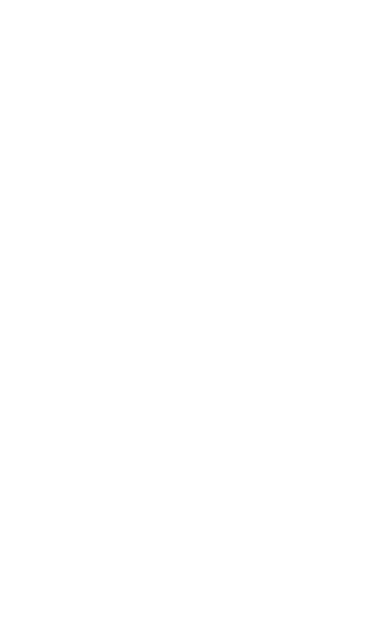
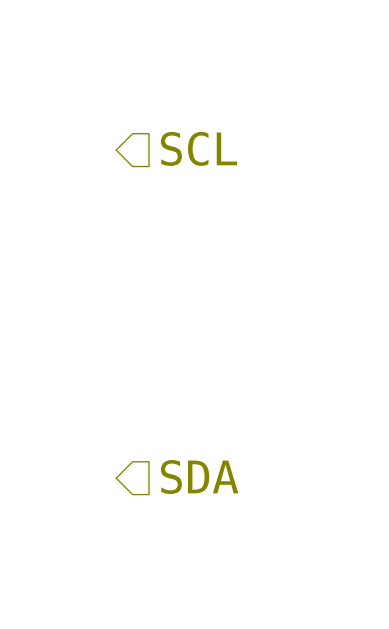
hierarchical label: none -> SCL (198, 148)
hierarchical label: none -> SDA (199, 476)

